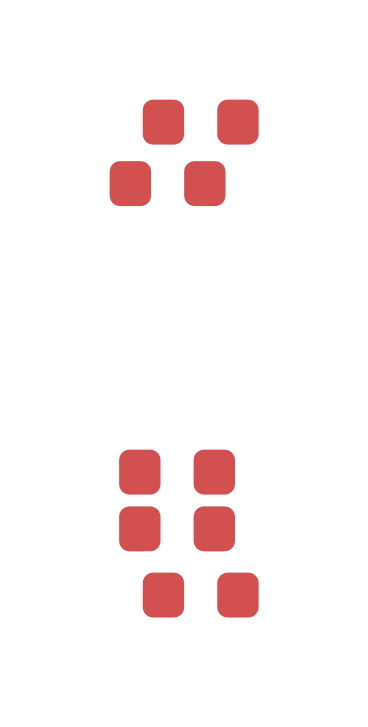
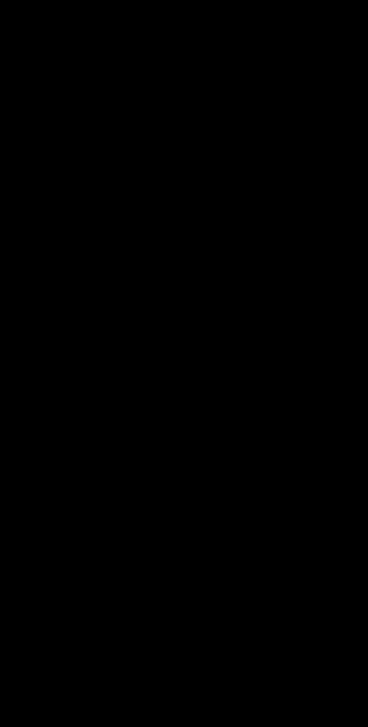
part: (200, 122) -> none
part: (167, 183) -> none
part: (177, 472) -> none
part: (177, 528) -> none
part: (200, 595) -> none

